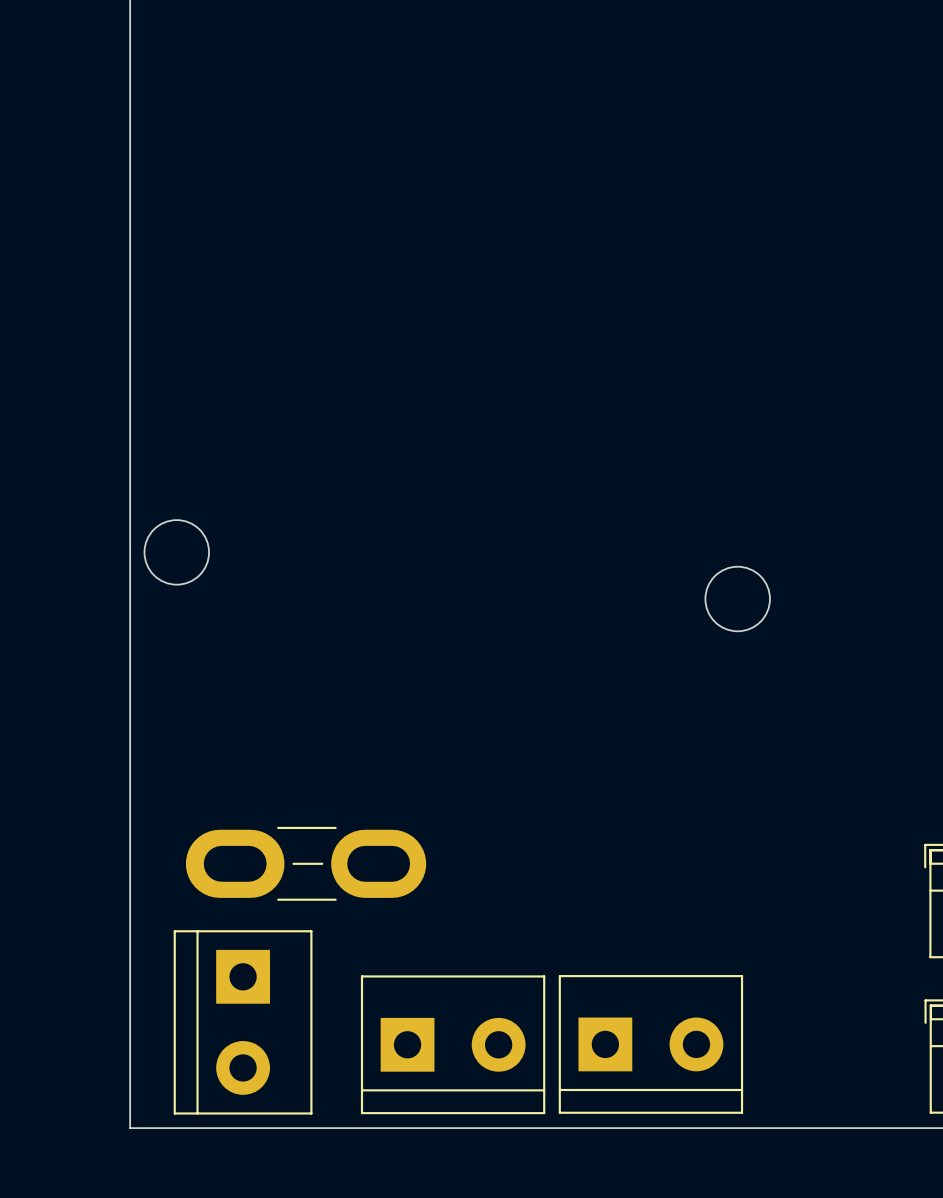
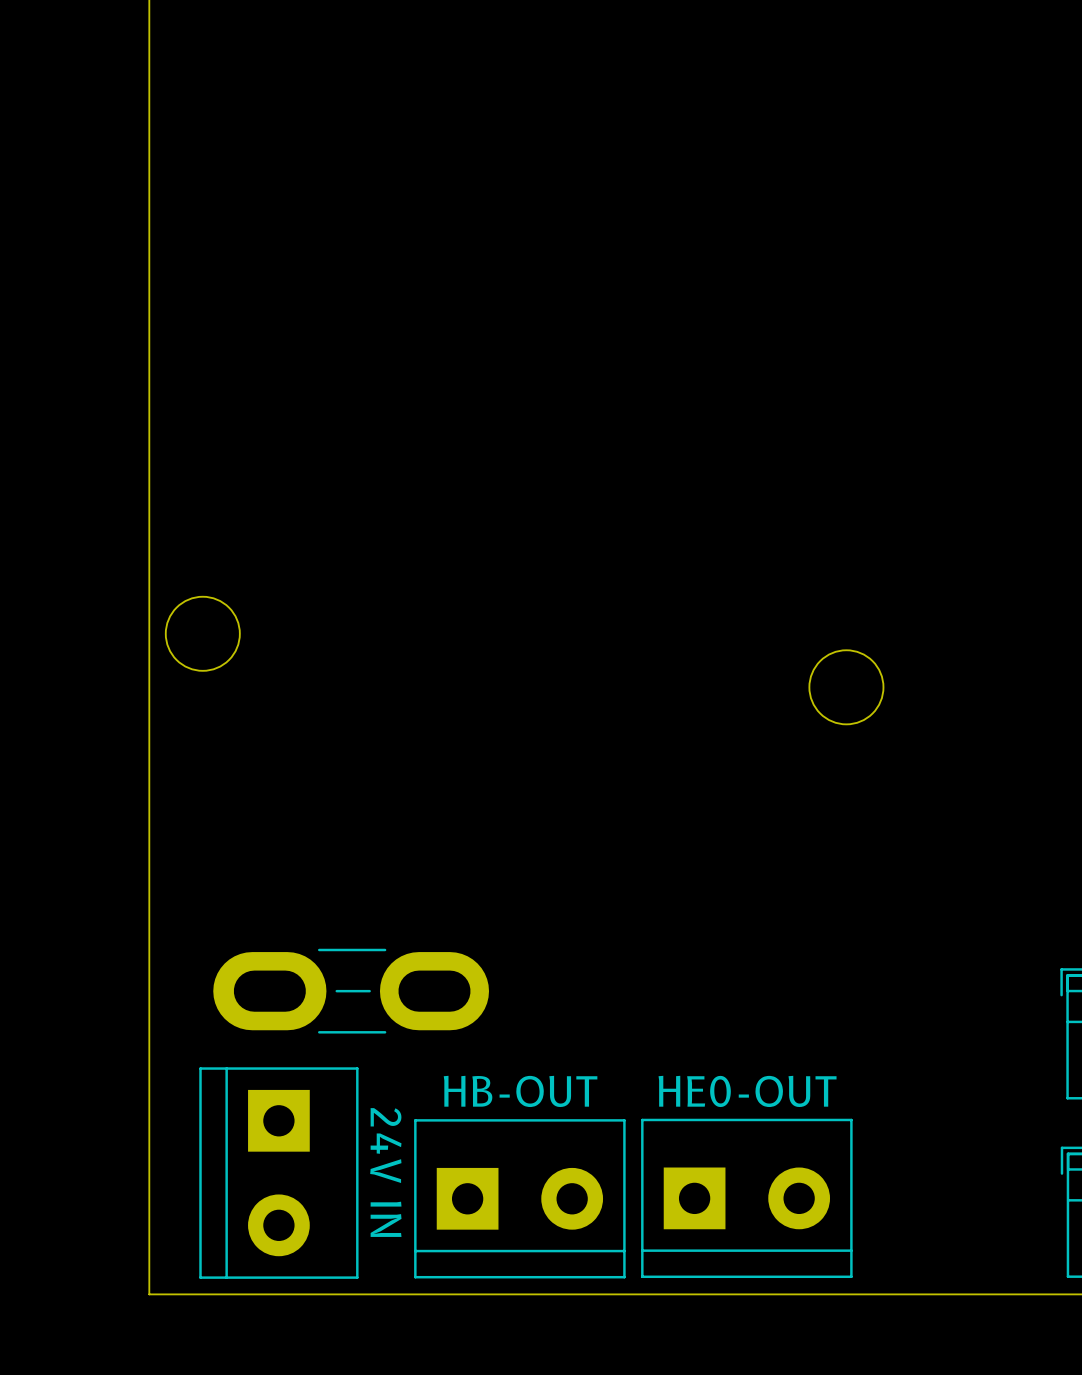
text: none -> HB-OUT (520, 1091)
text: none -> HE0-OUT (747, 1091)
text: none -> 24V IN (385, 1172)

